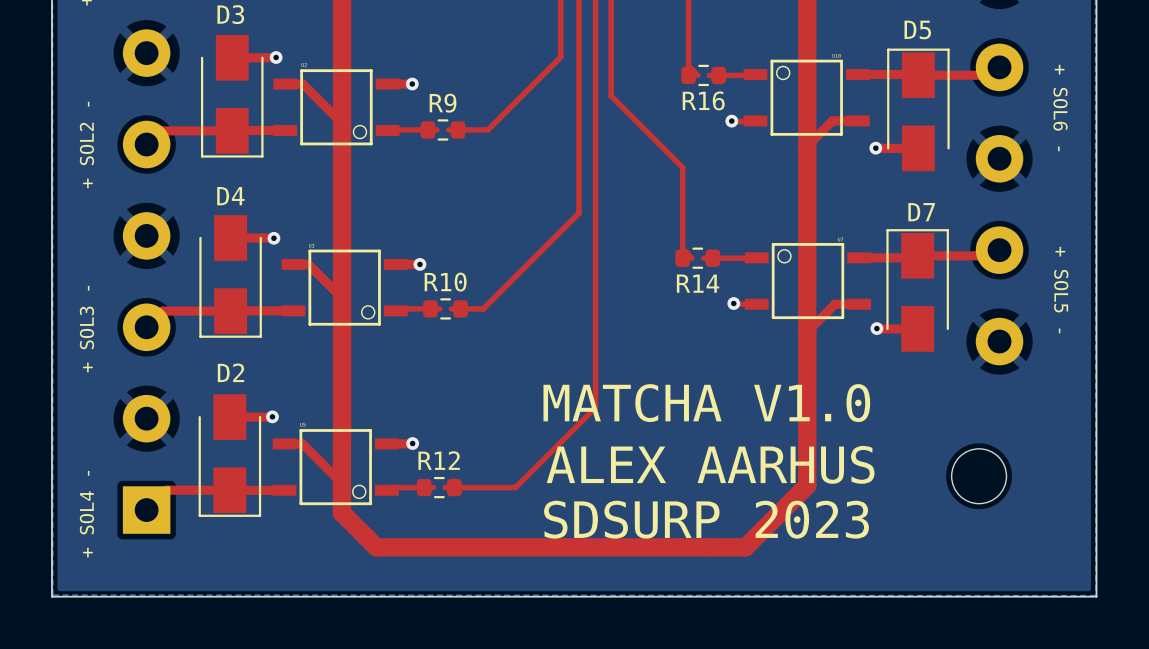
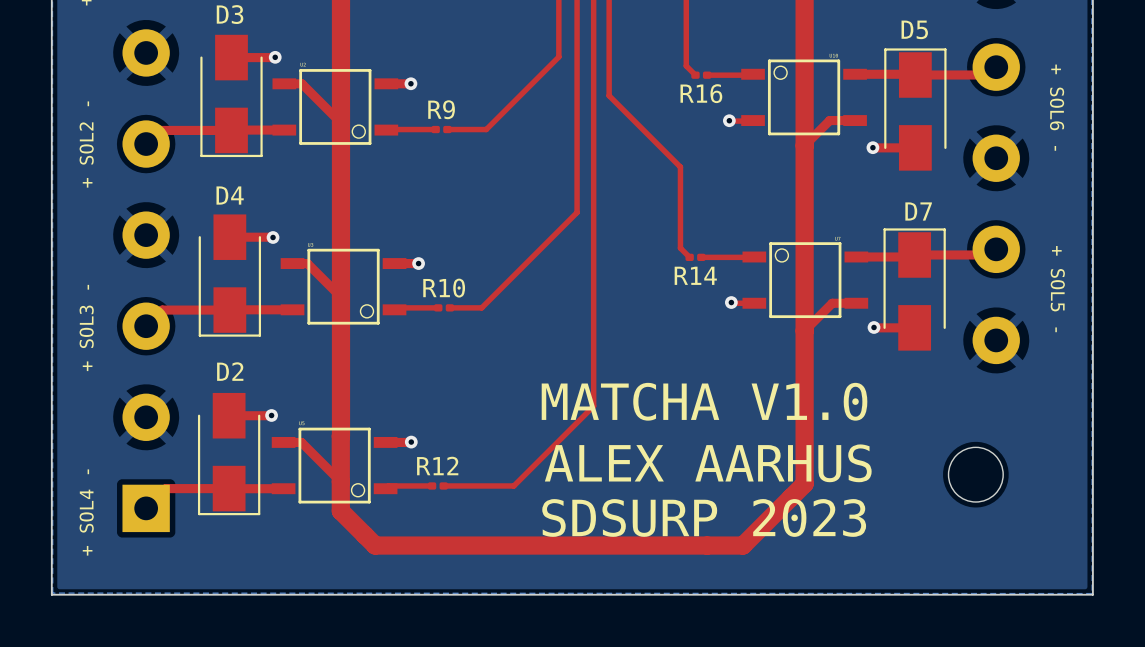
R16 footprint: [681, 64, 727, 87] -> [691, 71, 712, 79]
R9 footprint: [420, 119, 466, 141] -> [431, 125, 452, 134]
R14 footprint: [675, 247, 721, 269] -> [685, 253, 706, 262]
R10 footprint: [423, 298, 468, 320] -> [434, 304, 455, 312]
R12 footprint: [416, 476, 462, 499] -> [427, 482, 448, 490]

